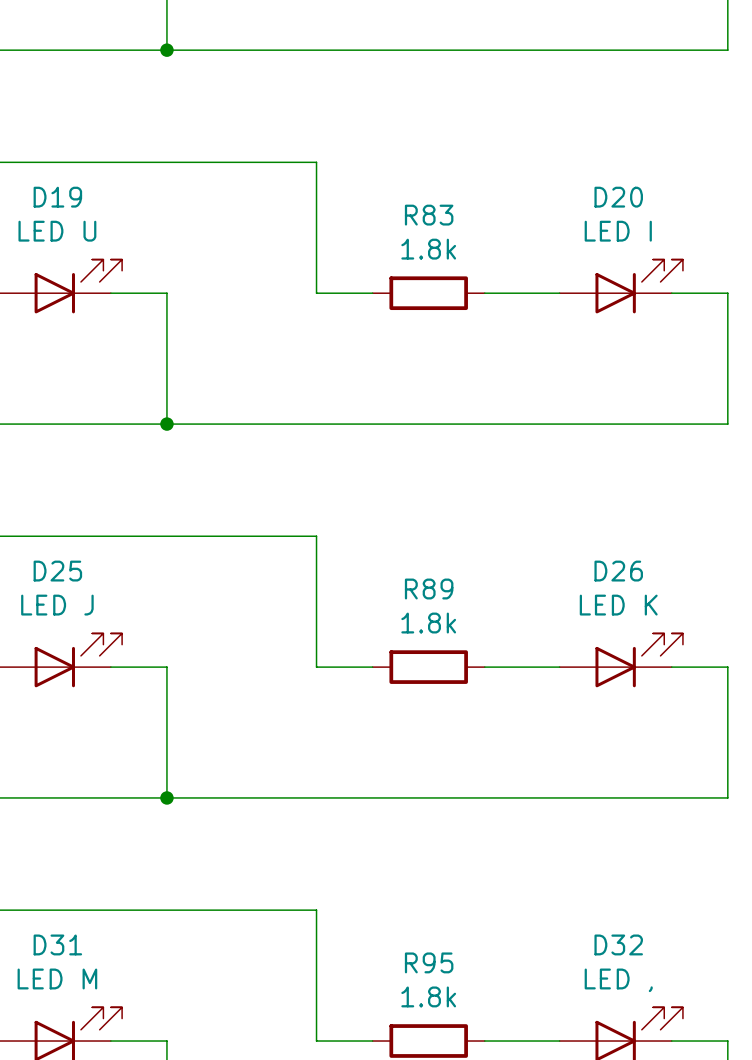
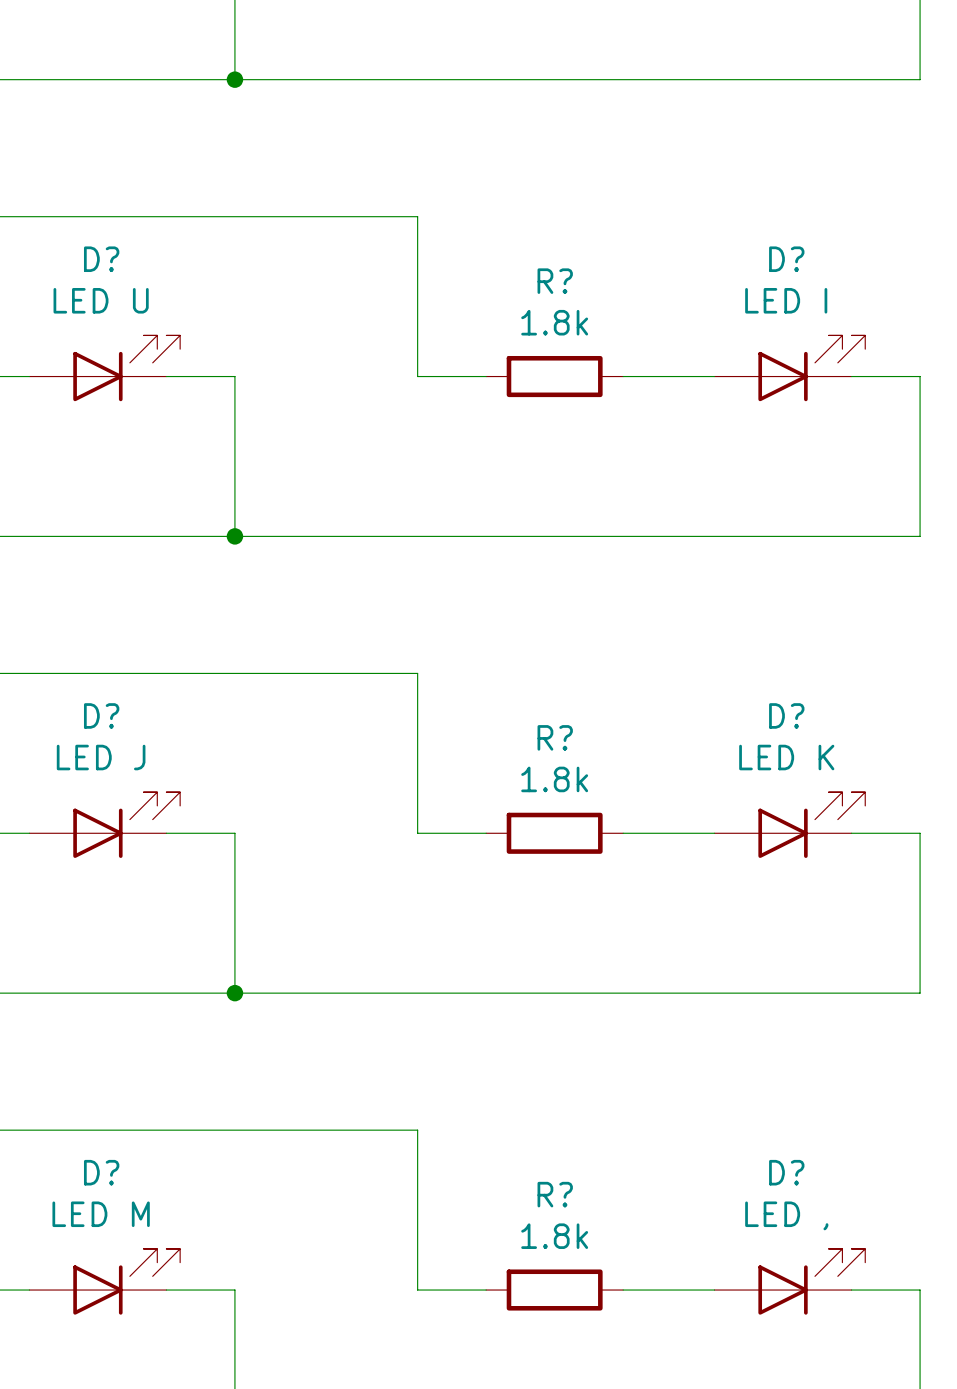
D19 name: D19 (57, 197) -> D? (101, 259)
D20 name: D20 (618, 197) -> D? (786, 259)
R83 name: R83 (429, 215) -> R? (555, 281)
D25 name: D25 (57, 571) -> D? (101, 715)
D26 name: D26 (618, 571) -> D? (786, 715)
R89 name: R89 (429, 589) -> R? (555, 737)
D31 name: D31 (57, 944) -> D? (101, 1172)
D32 name: D32 (618, 944) -> D? (786, 1172)
R95 name: R95 (429, 962) -> R? (555, 1194)

